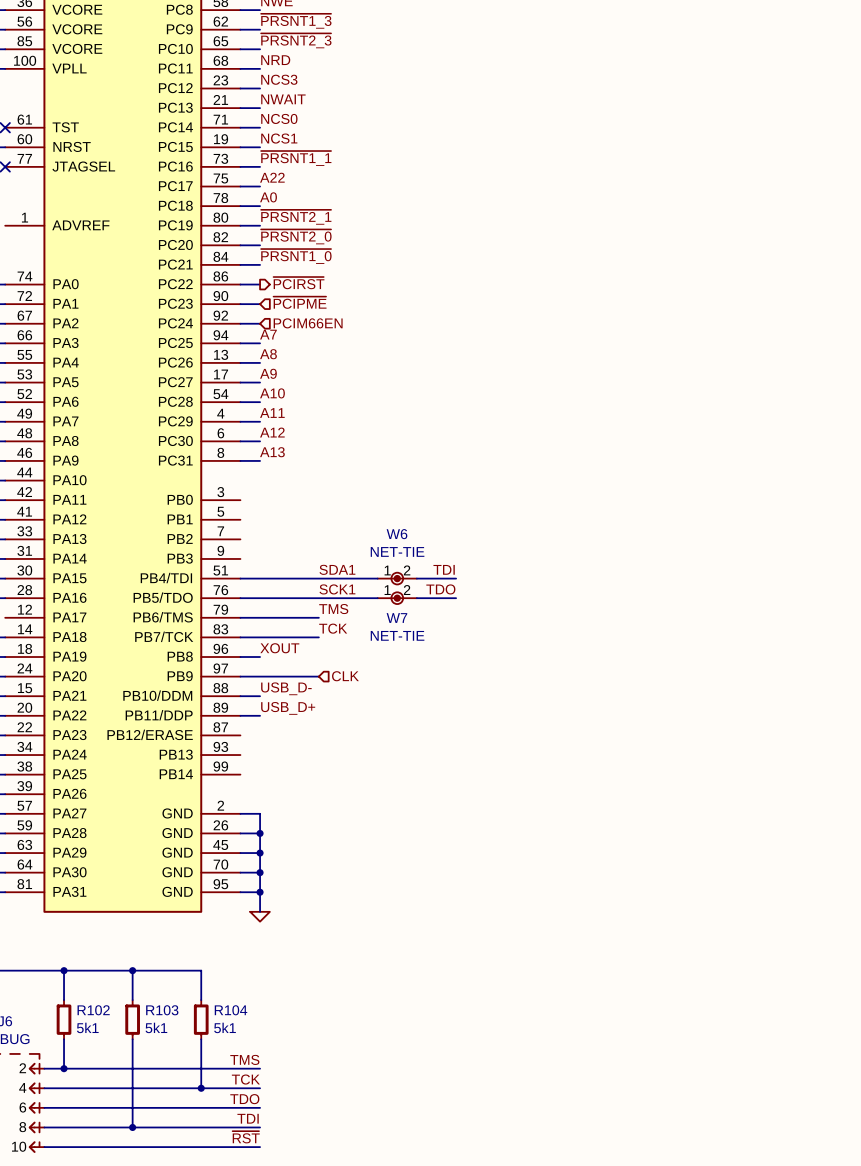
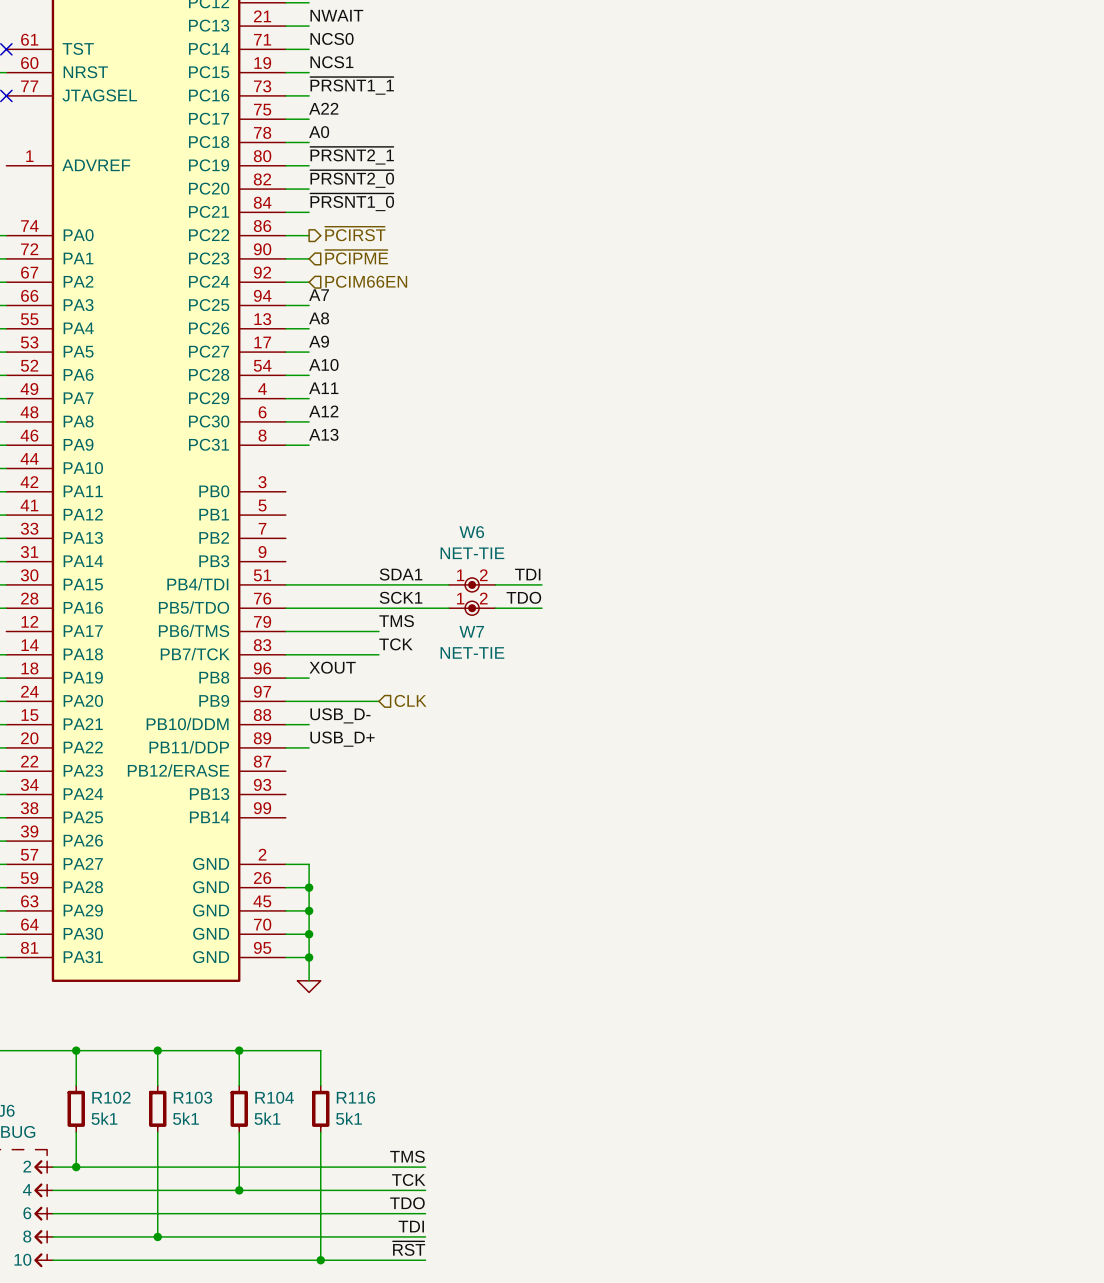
wire: none -> (239, 1050) (320, 1050) (320, 1085)
junction: none -> (239, 1050)
R116: none -> 5k1 (320, 1108)
wire: none -> (320, 1132) (320, 1260)
label position: TMS (244, 1059) -> TMS (407, 1156)
wire: none -> (309, 1167) (425, 1167)
label position: TCK (245, 1079) -> TCK (408, 1179)
wire: none -> (309, 1190) (425, 1190)
label position: TDO (244, 1099) -> TDO (407, 1203)
wire: none -> (309, 1213) (425, 1213)
label position: TDI (248, 1118) -> TDI (411, 1226)
wire: none -> (309, 1236) (425, 1236)
label position: ~{RST} (246, 1137) -> ~{RST} (409, 1248)
wire: none -> (309, 1260) (425, 1260)
junction: none -> (320, 1260)

